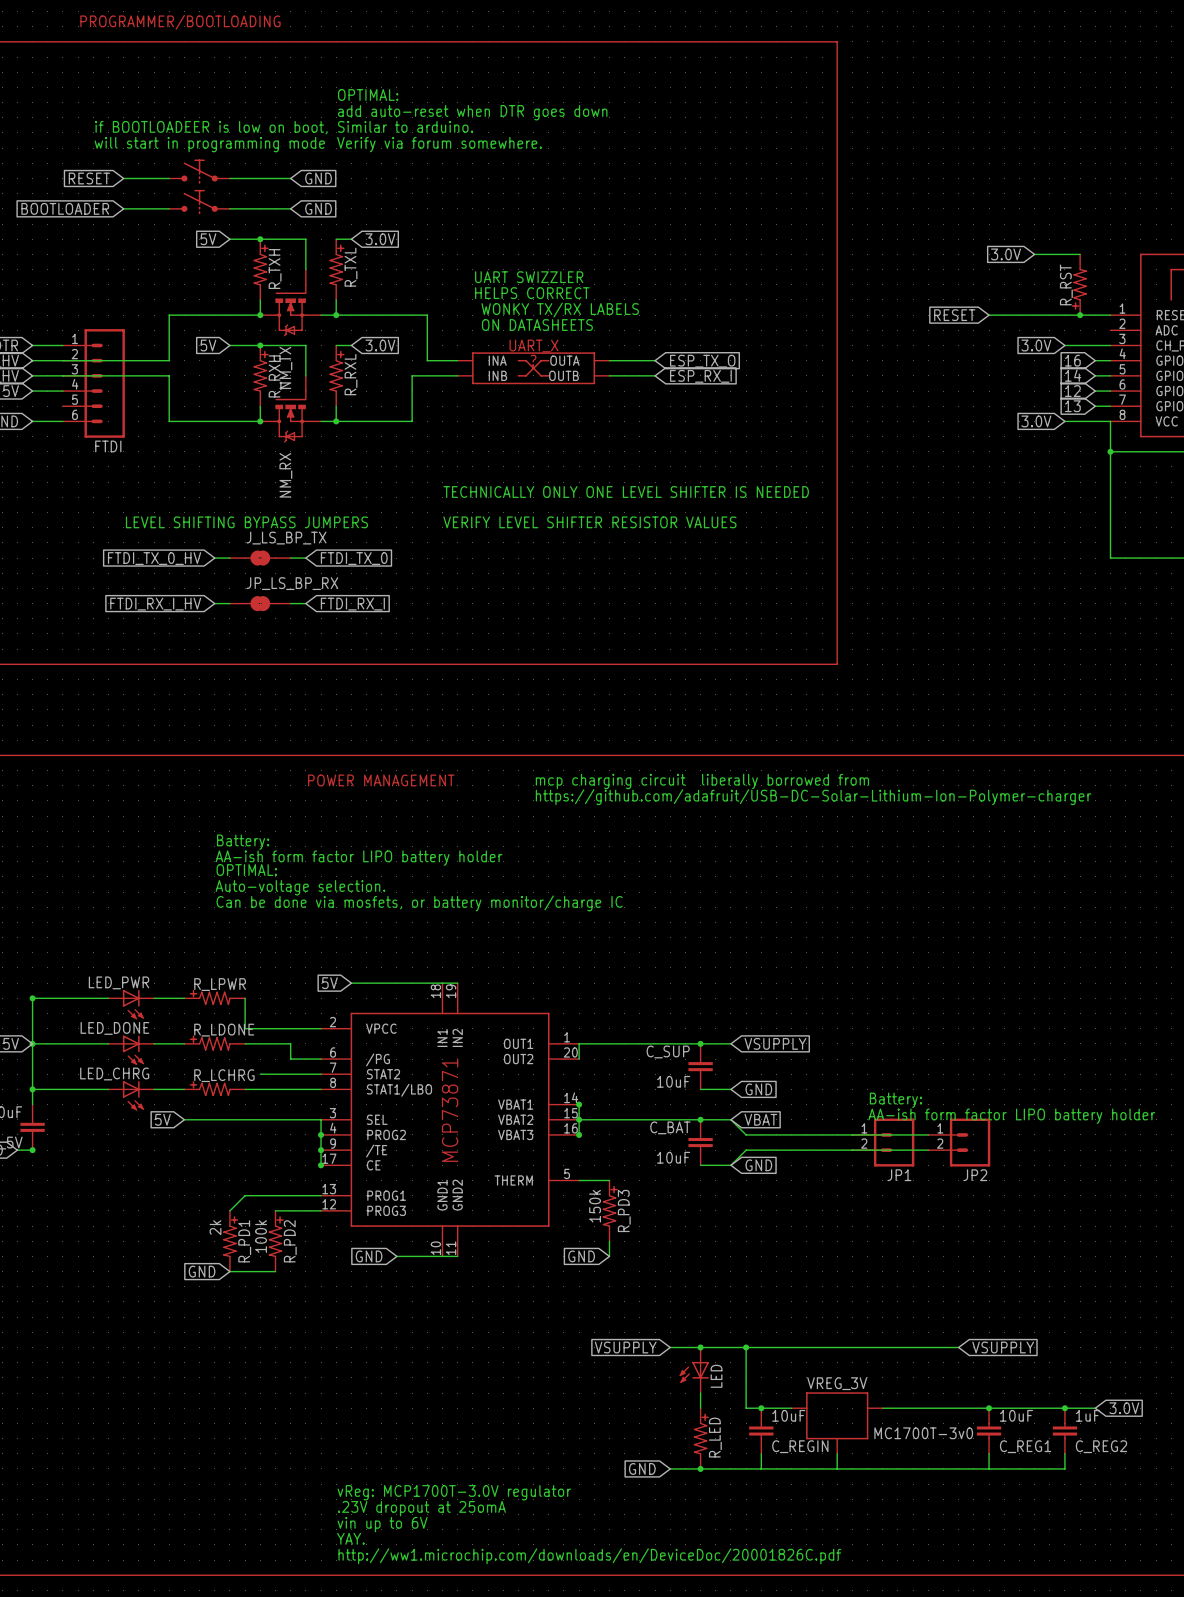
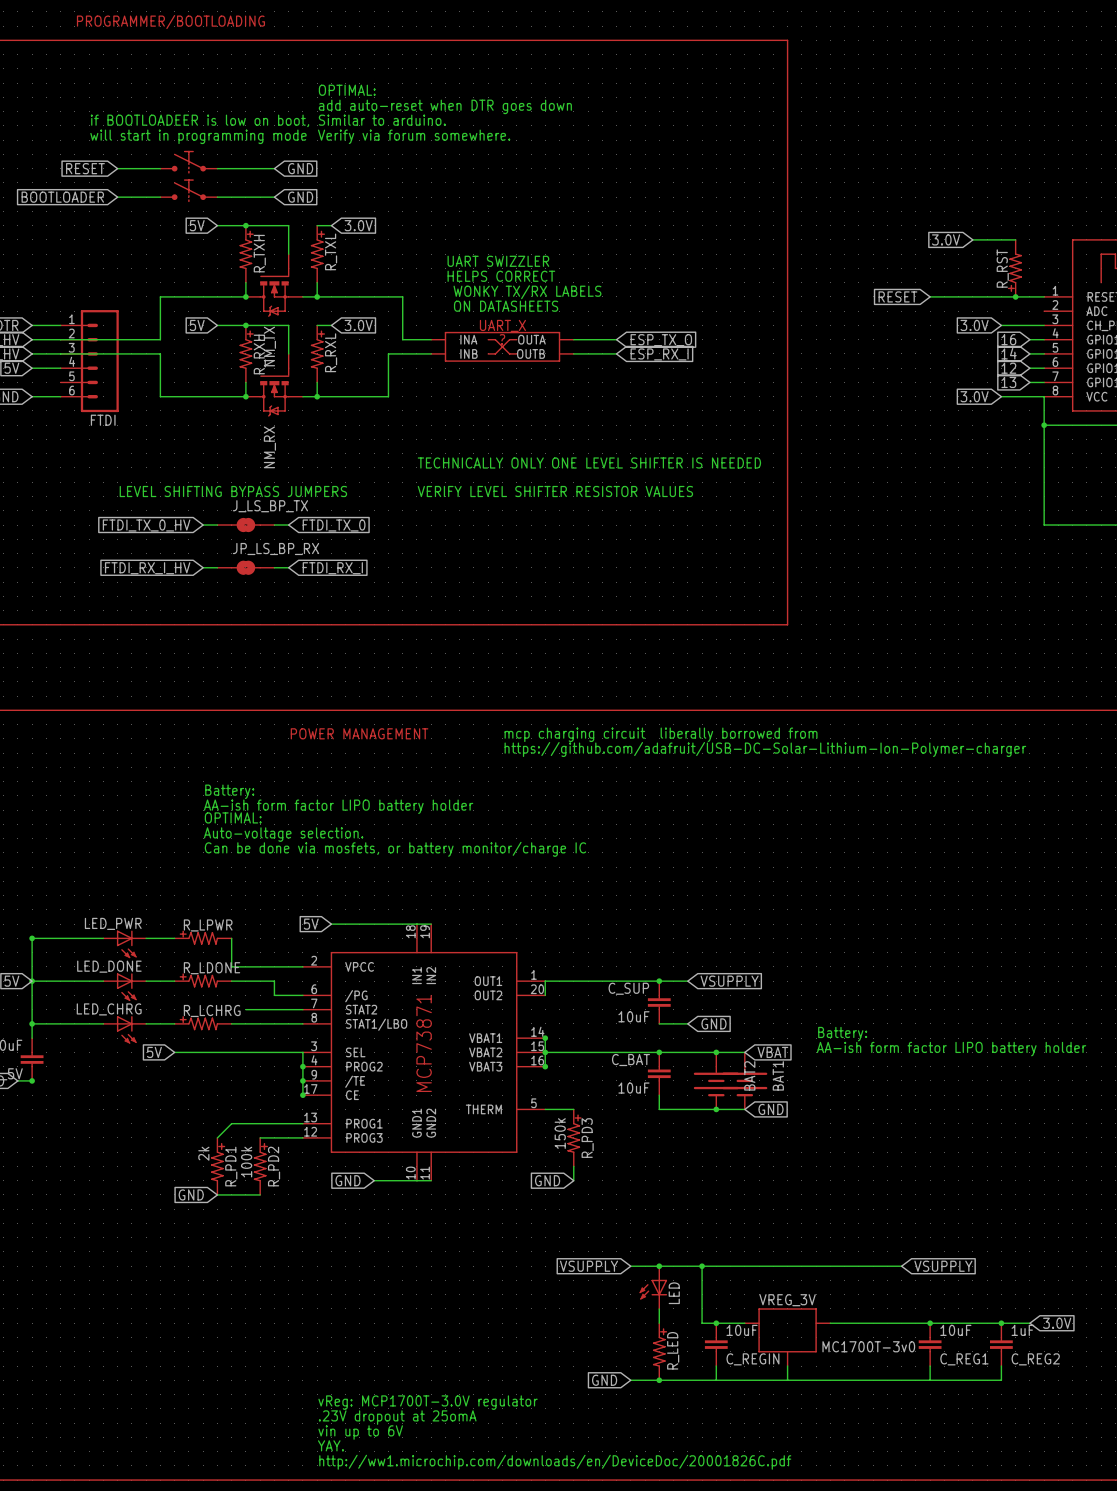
wire: (730, 1119) (746, 1134) (928, 1134) -> (687, 1052) (744, 1052)
global label position: VBAT (760, 1119) -> VBAT (772, 1052)
junction: none -> (716, 1052)
JP1: (883, 1142) -> none
JP2: (959, 1142) -> none
BAT2: none -> (716, 1080)
BAT1: none -> (744, 1080)
wire: (928, 1150) (746, 1150) (730, 1165) (700, 1165) -> (744, 1109) (659, 1109) (659, 1095)
global label position: GND (758, 1165) -> GND (771, 1109)
junction: none -> (716, 1109)

